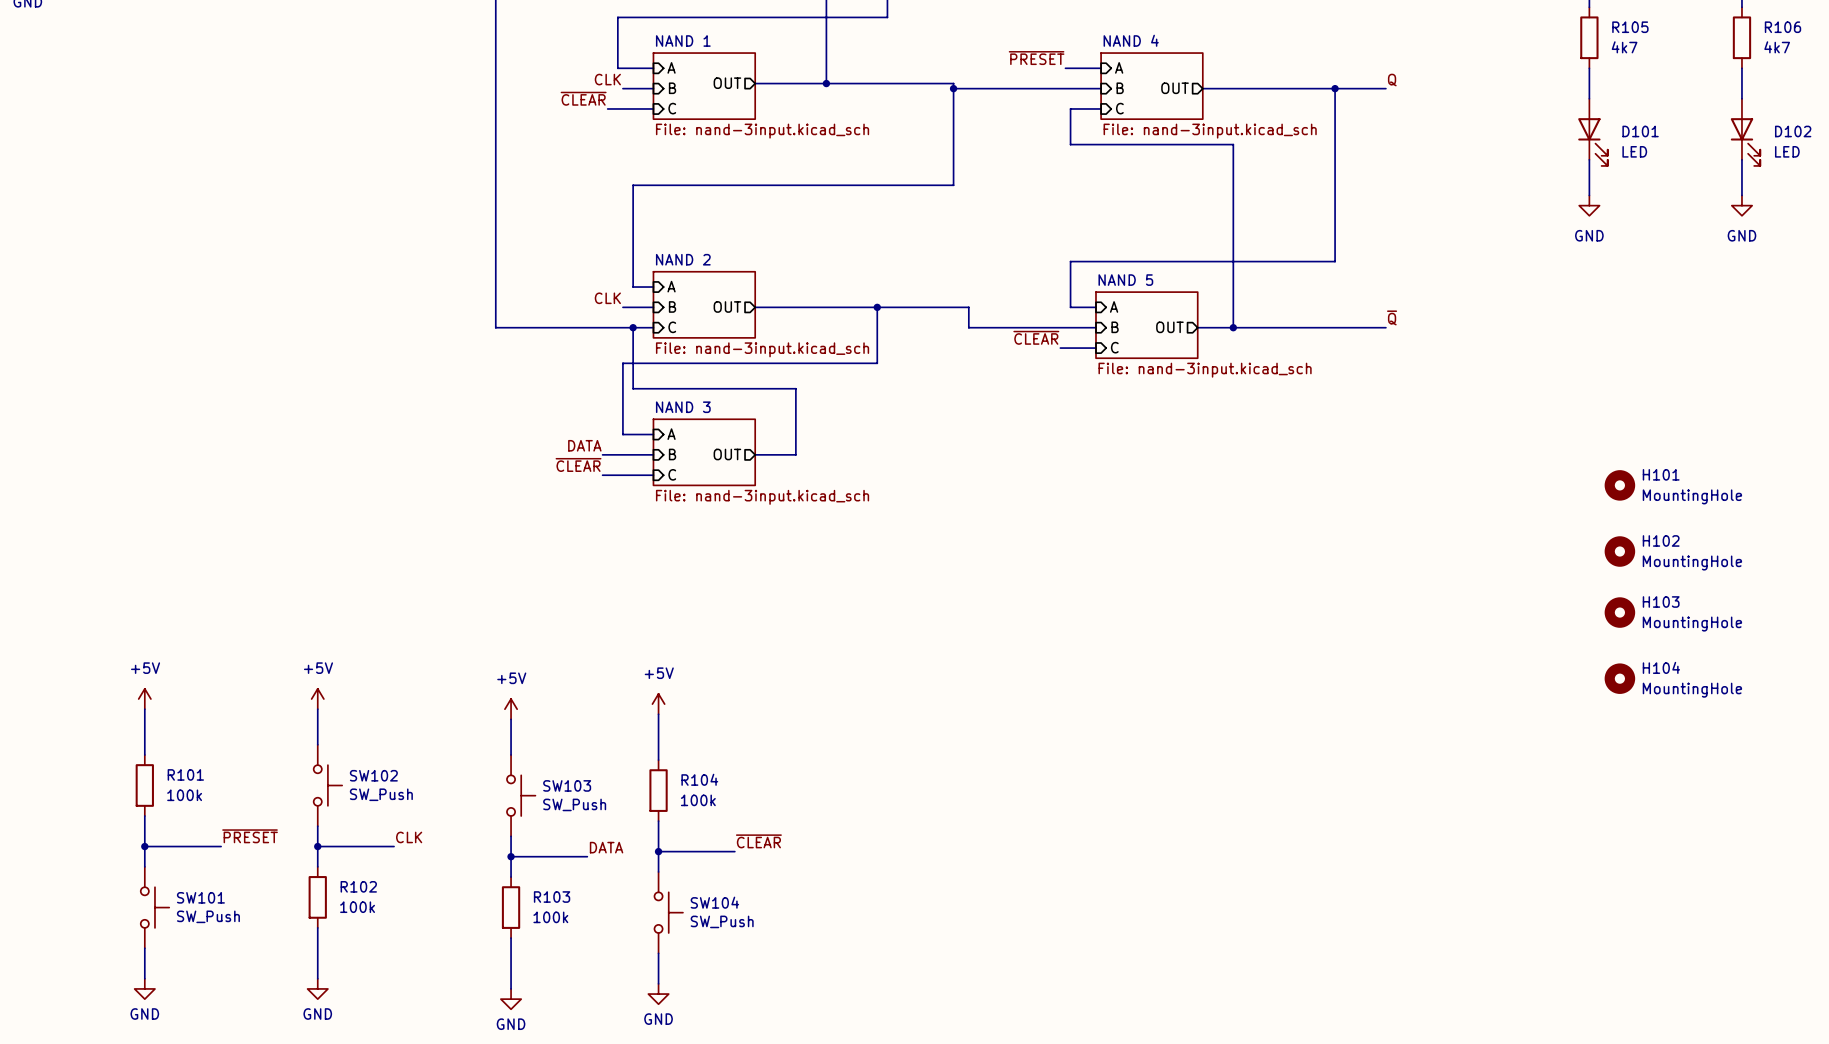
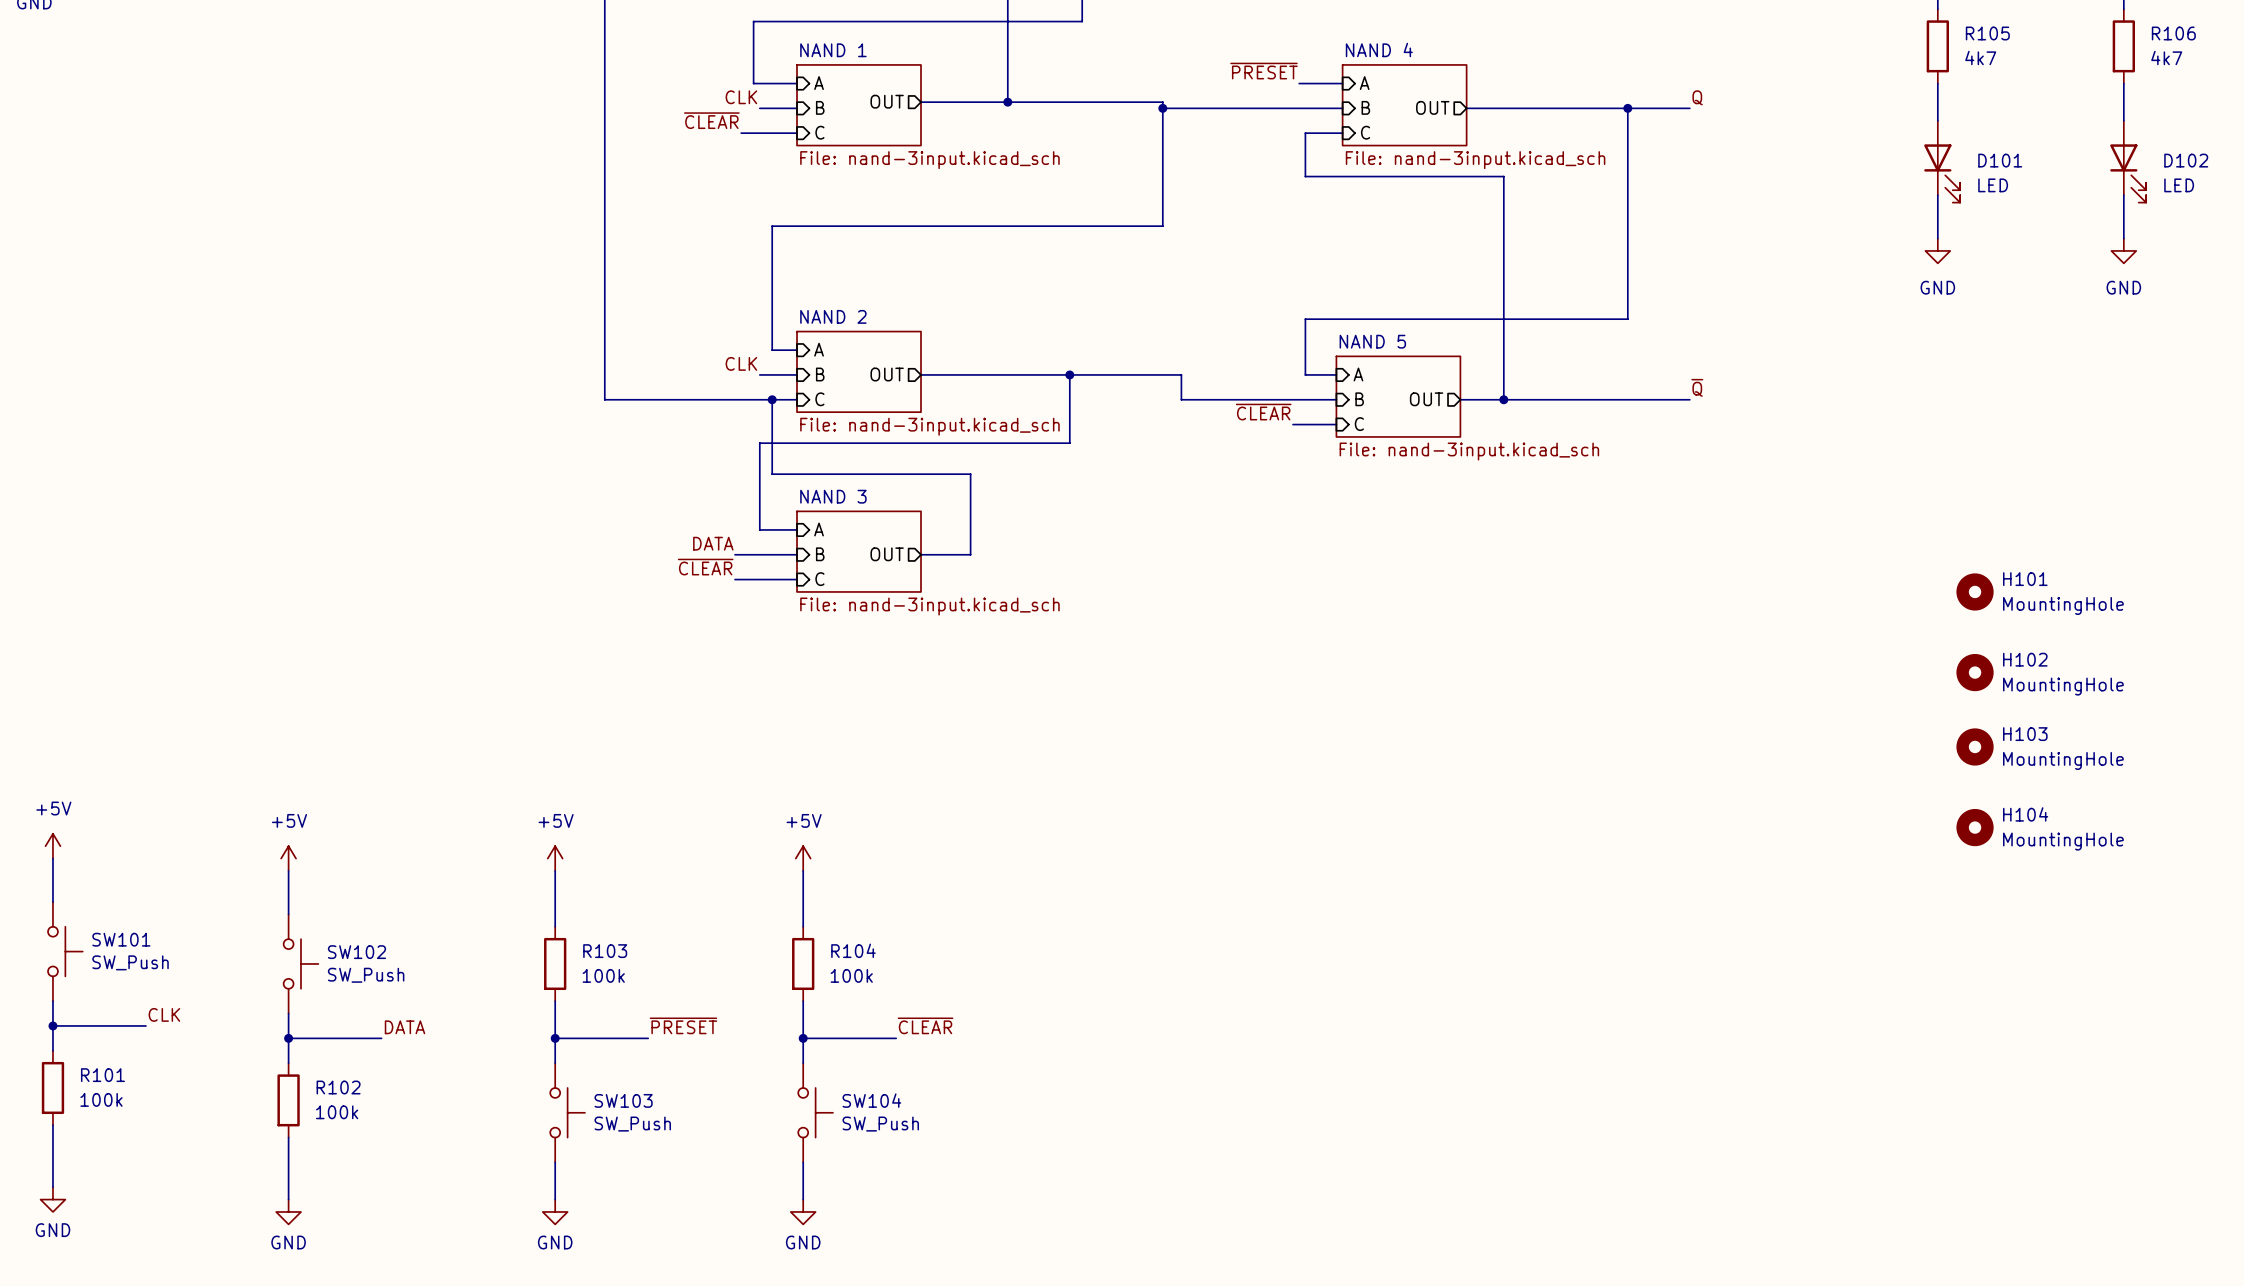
power symbol: none -> +5V (52, 846)
power symbol: +5V (144, 699) -> none
power symbol: +5V (317, 699) -> none
wire: none -> (52, 858) (52, 901)
power symbol: none -> +5V (288, 858)
wire: (144, 709) (144, 754) -> none
wire: (317, 709) (317, 744) -> (288, 870) (288, 914)
power symbol position: +5V (511, 709) -> +5V (555, 858)
wire: none -> (555, 870) (555, 926)
wire: (511, 719) (511, 754) -> none
R101 position: (144, 785) -> (52, 1087)
SW102 position: (327, 785) -> (300, 963)
SW103 position: (521, 795) -> (567, 1112)
wire: (144, 816) (144, 866) -> (52, 1125) (52, 1187)
wire: none -> (52, 1001) (52, 1050)
wire: (317, 826) (317, 866) -> (288, 1013) (288, 1063)
label: none -> CLK (164, 1014)
label: ~{PRESET} (250, 836) -> none
wire: (511, 836) (511, 877) -> none
label: CLK (409, 837) -> none
junction: none -> (52, 1025)
label: none -> ~{PRESET} (683, 1025)
label: none -> DATA (405, 1027)
wire: (144, 846) (221, 846) -> (52, 1025) (145, 1025)
junction: (144, 846) -> none
wire: (317, 846) (394, 846) -> (288, 1038) (381, 1038)
junction: (317, 846) -> none
label: DATA (606, 847) -> none
junction: none -> (288, 1038)
junction: none -> (555, 1038)
wire: (511, 856) (587, 856) -> (555, 1038) (648, 1038)
junction: (511, 856) -> none
R102 position: (317, 897) -> (288, 1100)
SW101 position: (154, 907) -> (65, 951)
R103 position: (511, 907) -> (555, 963)
wire: (317, 927) (317, 978) -> (288, 1137) (288, 1199)
wire: (511, 938) (511, 988) -> (555, 1001) (555, 1063)
wire: (144, 948) (144, 978) -> none
wire: none -> (555, 1162) (555, 1199)
power symbol: none -> GND (52, 1199)
power symbol: GND (144, 988) -> none
power symbol: GND (317, 988) -> none
power symbol: none -> GND (288, 1211)
power symbol position: GND (511, 999) -> GND (555, 1211)

